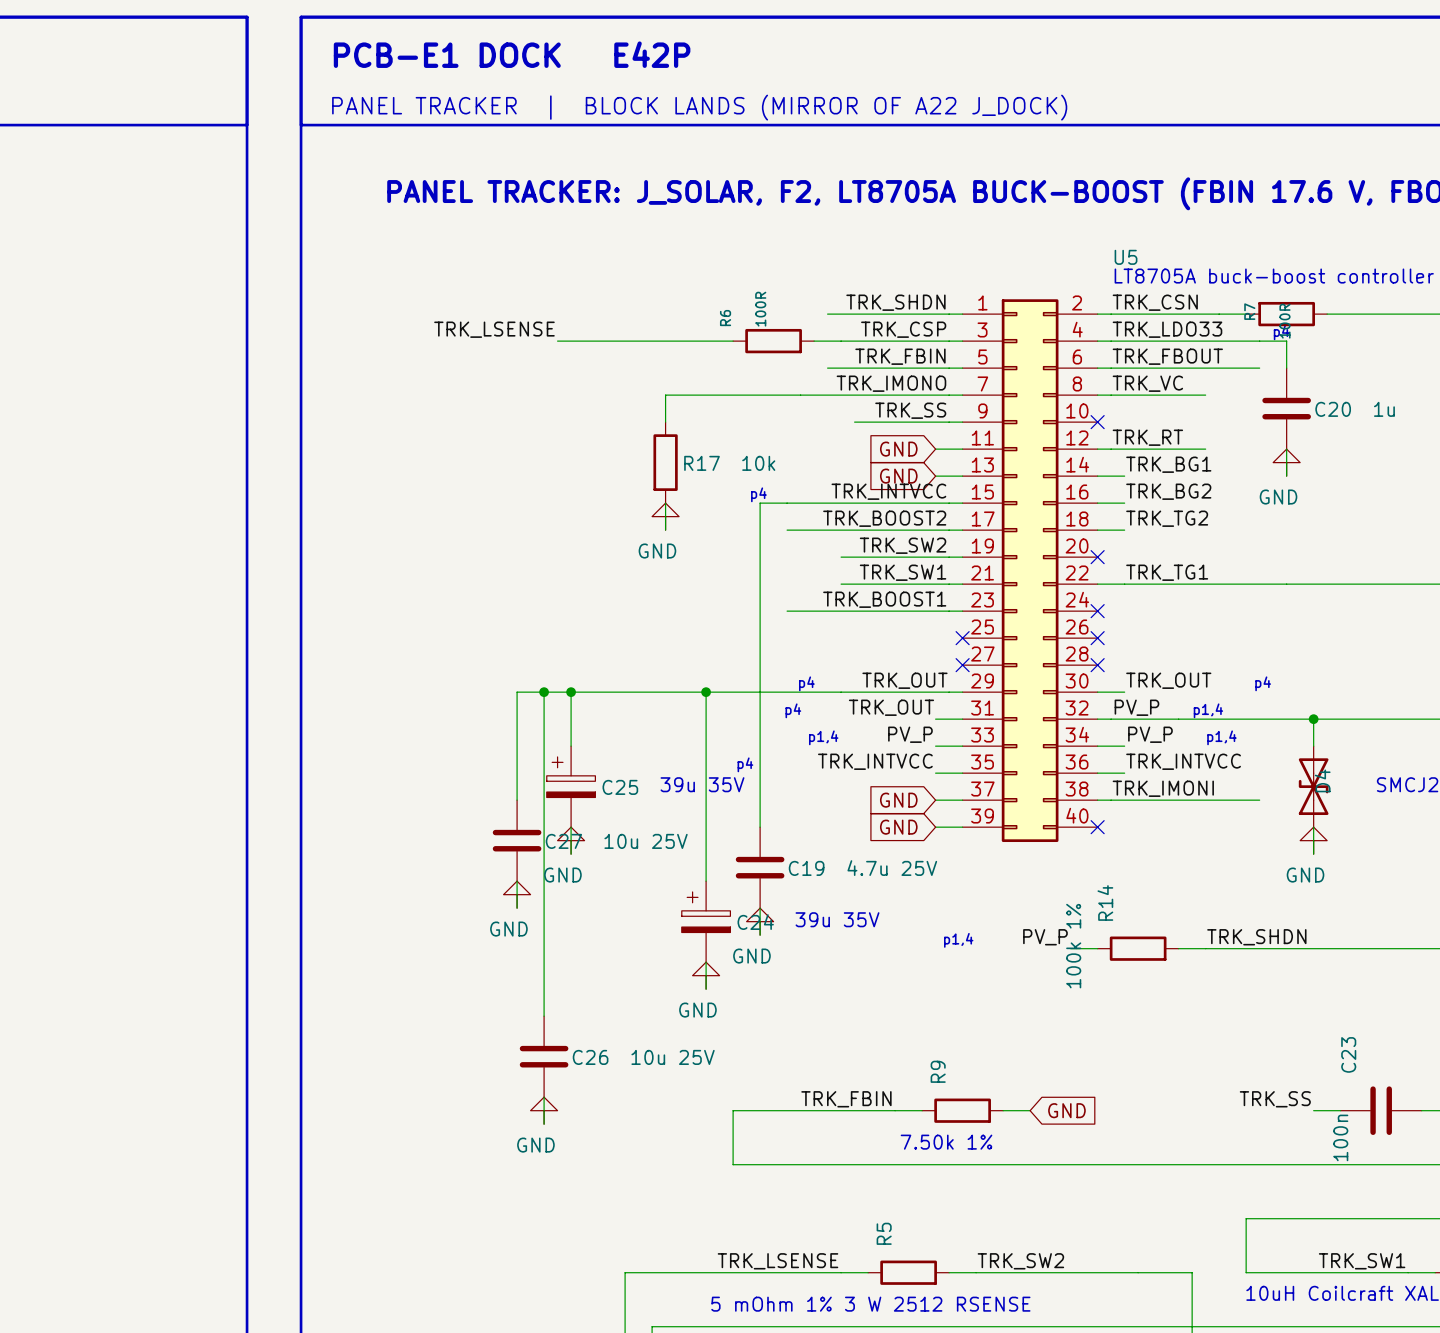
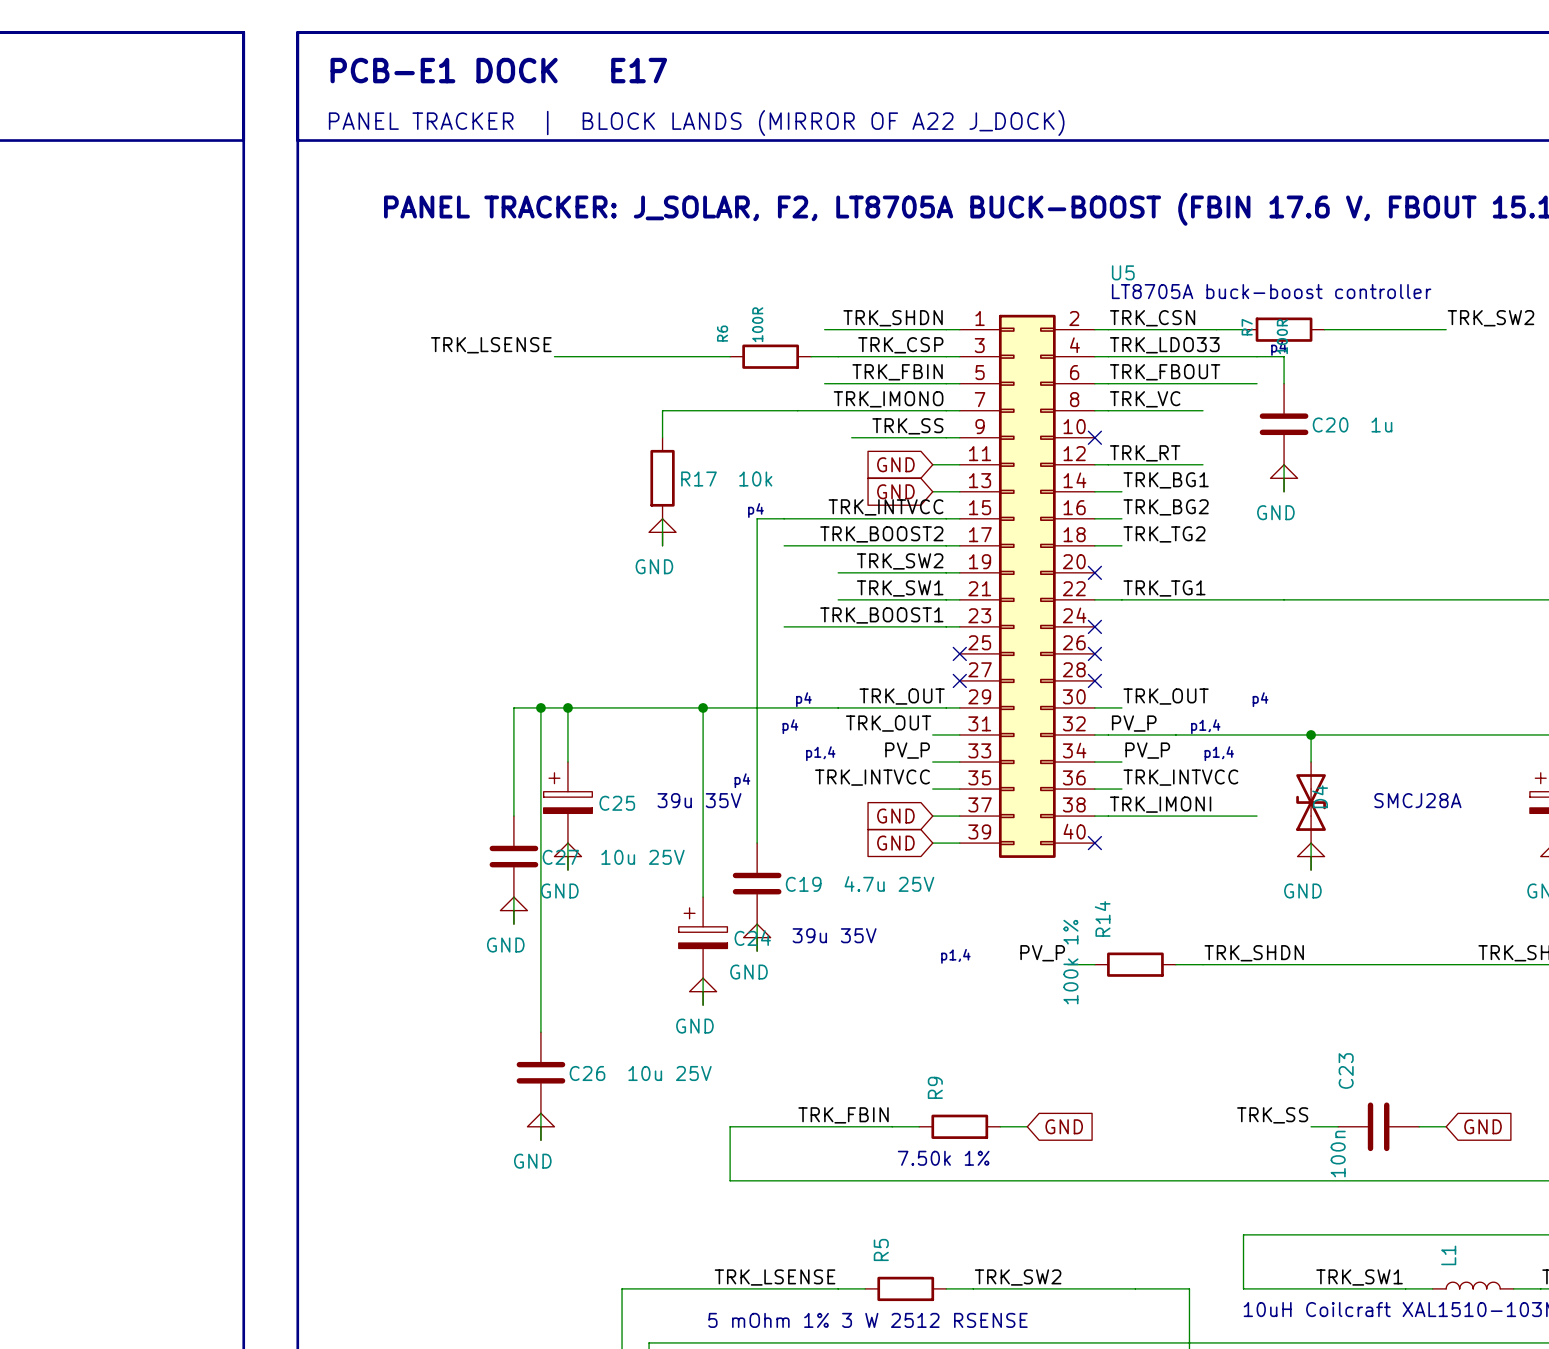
text: PCB-E1 DOCK E42P (512, 54) -> PCB-E1 DOCK E17 (498, 70)

